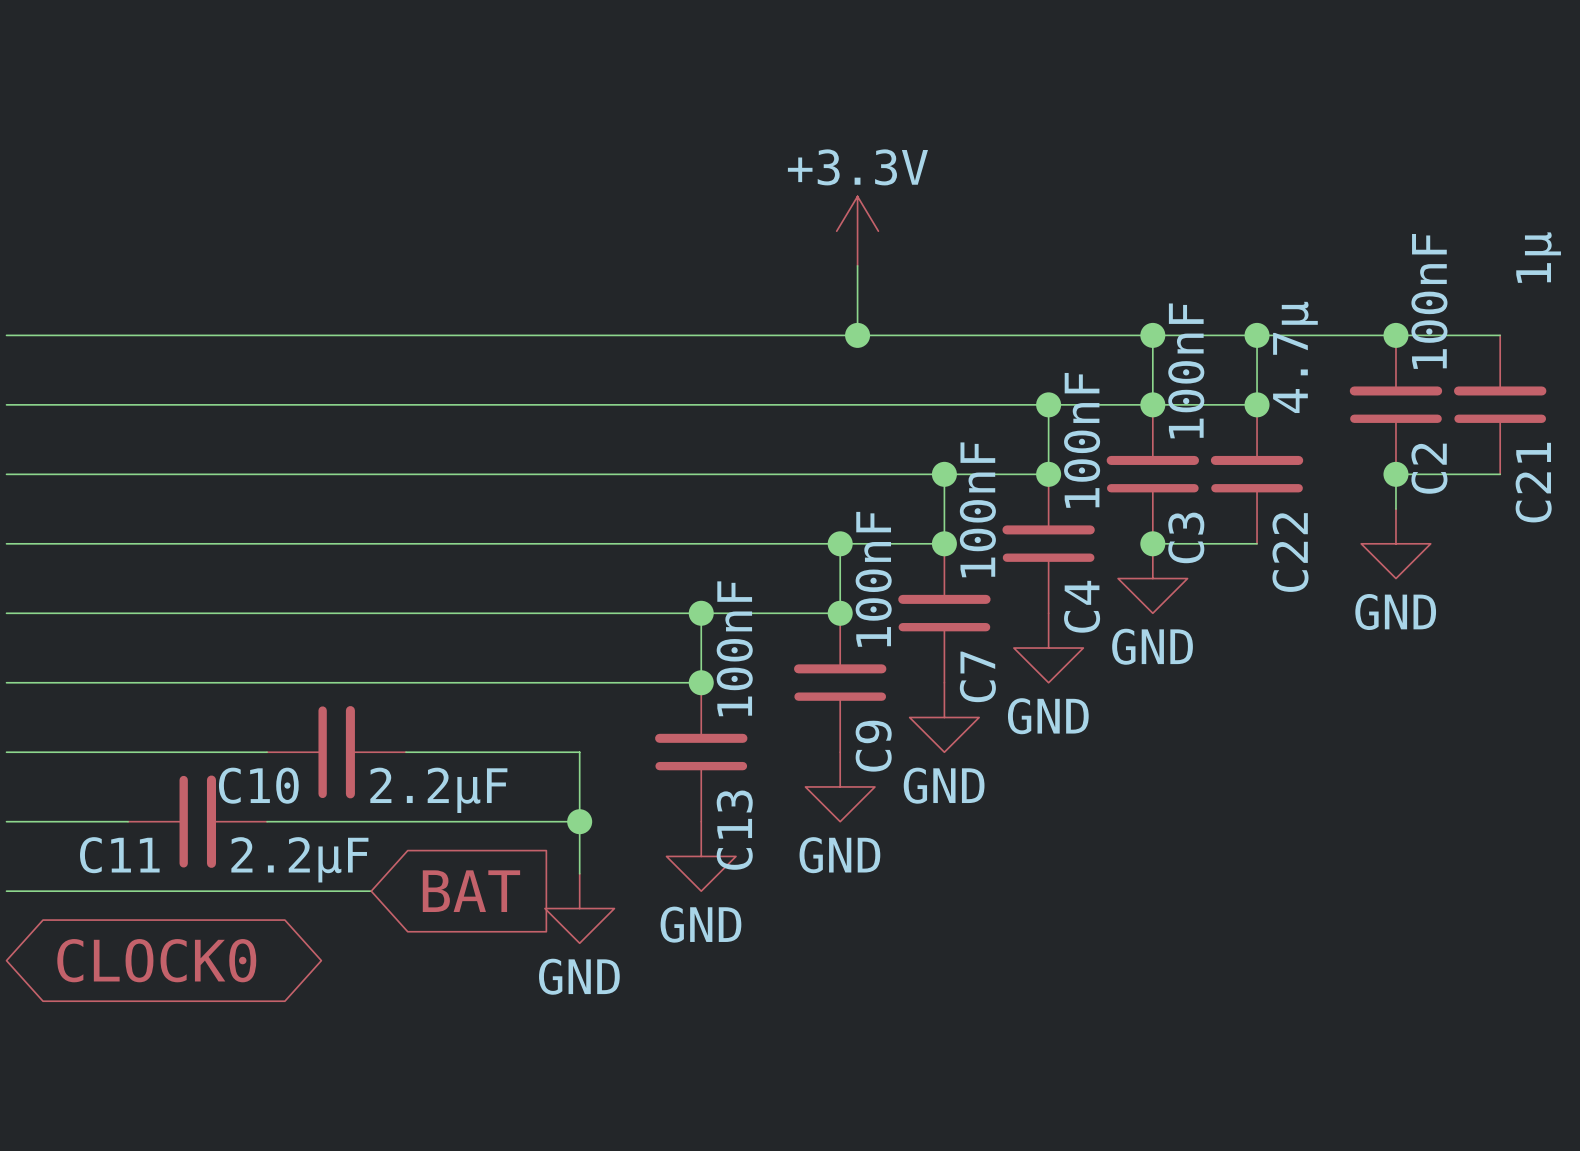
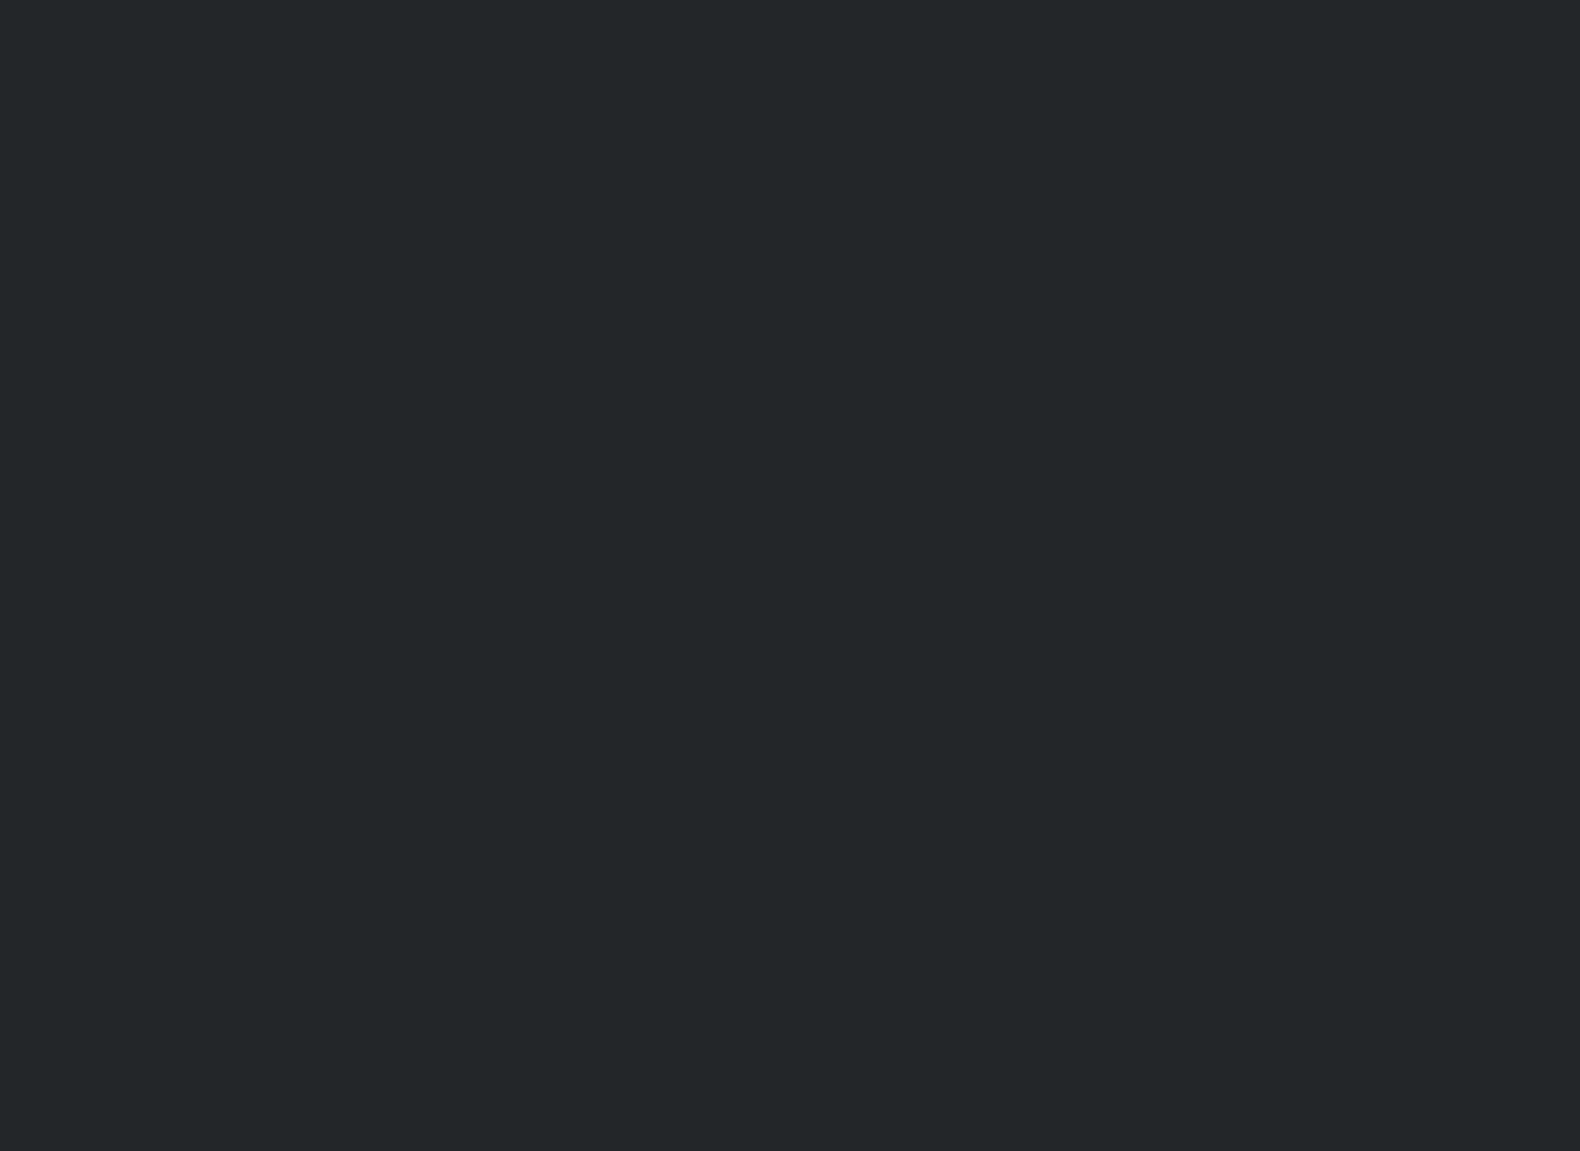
power symbol: +3.3V (857, 231) -> none
wire: (857, 265) (857, 335) -> none
wire: (6, 335) (1500, 335) -> none
junction: (857, 335) -> none
wire: (1152, 335) (1152, 404) -> none
junction: (1152, 335) -> none
wire: (1257, 335) (1257, 404) (6, 404) -> none
junction: (1257, 335) -> none
junction: (1395, 335) -> none
wire: (1048, 404) (1048, 474) (6, 474) -> none
junction: (1048, 404) -> none
junction: (1152, 404) -> none
junction: (1257, 404) -> none
C2: 100nF (1395, 404) -> none
C21: 1µ (1500, 404) -> none
wire: (944, 474) (944, 543) (6, 543) -> none
junction: (944, 474) -> none
junction: (1048, 474) -> none
C3: 100nF (1152, 474) -> none
C22: 4.7µ (1257, 474) -> none
junction: (1395, 474) -> none
wire: (1500, 474) (1395, 474) (1395, 509) -> none
wire: (840, 543) (840, 613) (6, 613) -> none
junction: (840, 543) -> none
junction: (944, 543) -> none
C4: 100nF (1048, 543) -> none
wire: (1152, 543) (1257, 543) -> none
junction: (1152, 543) -> none
power symbol: GND (1395, 543) -> none
power symbol: GND (1152, 578) -> none
wire: (701, 613) (701, 682) (6, 682) -> none
junction: (701, 613) -> none
junction: (840, 613) -> none
C7: 100nF (944, 613) -> none
power symbol: GND (1048, 648) -> none
junction: (701, 682) -> none
C9: 100nF (840, 682) -> none
power symbol: GND (944, 717) -> none
wire: (6, 752) (267, 752) -> none
C10: 2.2µF (336, 752) -> none
wire: (406, 752) (579, 752) (579, 873) -> none
C13: 100nF (701, 752) -> none
power symbol: GND (840, 786) -> none
wire: (6, 821) (128, 821) -> none
C11: 2.2µF (197, 821) -> none
wire: (267, 821) (579, 821) -> none
junction: (579, 821) -> none
power symbol: GND (701, 856) -> none
wire: (6, 891) (371, 891) -> none
global label: BAT (471, 891) -> none
power symbol: GND (579, 908) -> none
global label: CLOCK0 (156, 960) -> none

